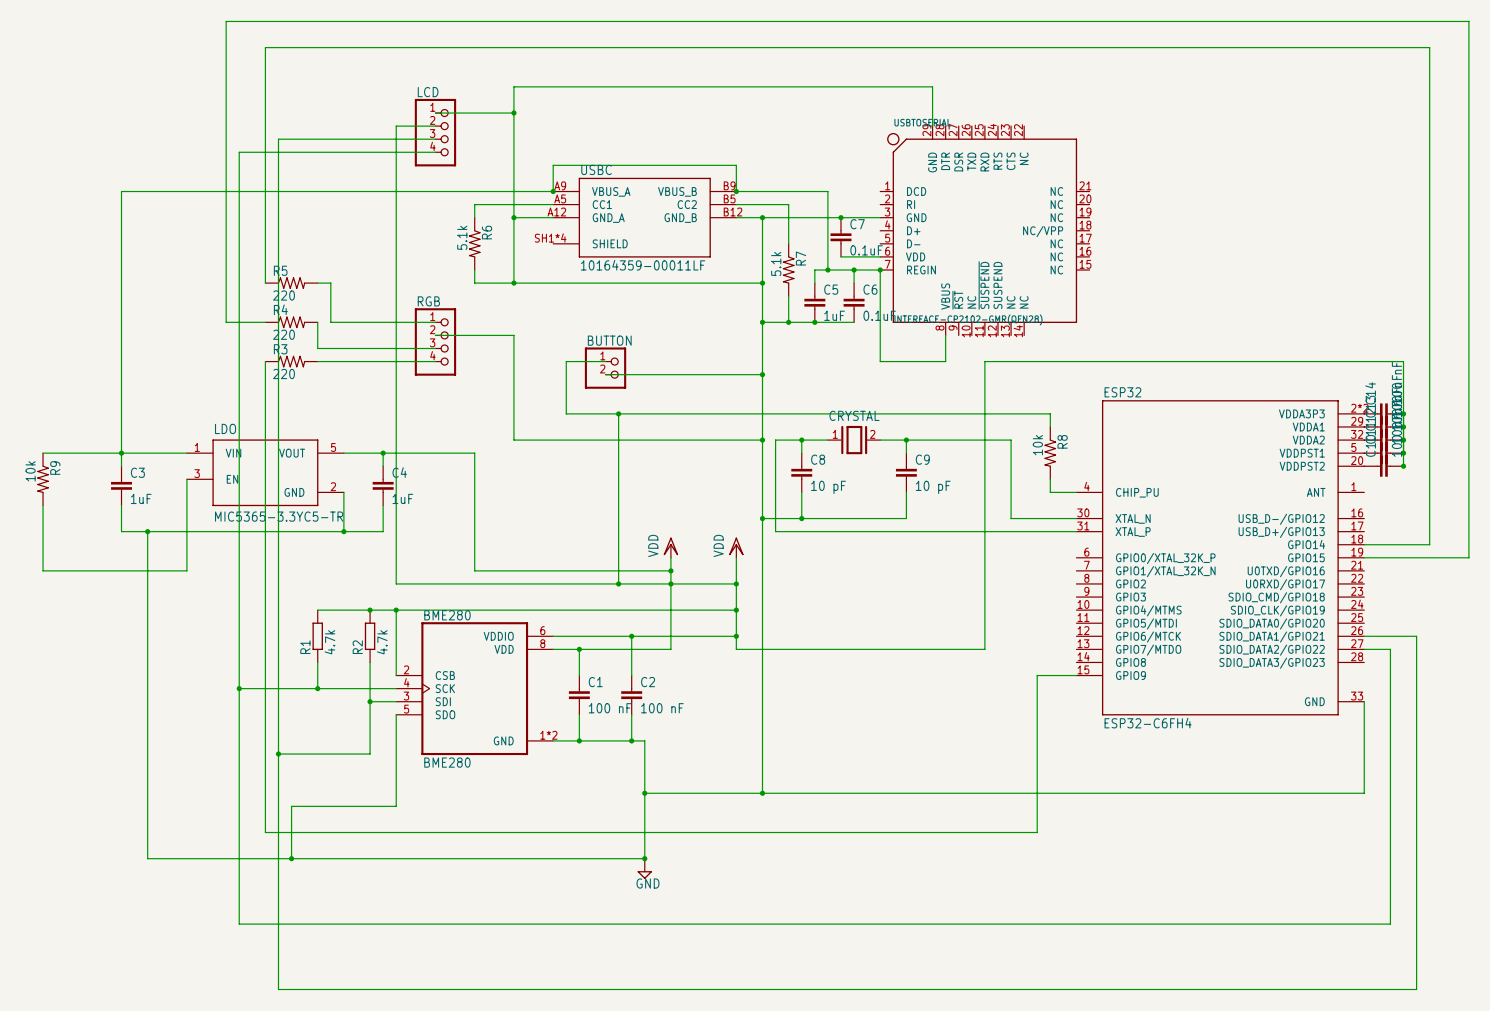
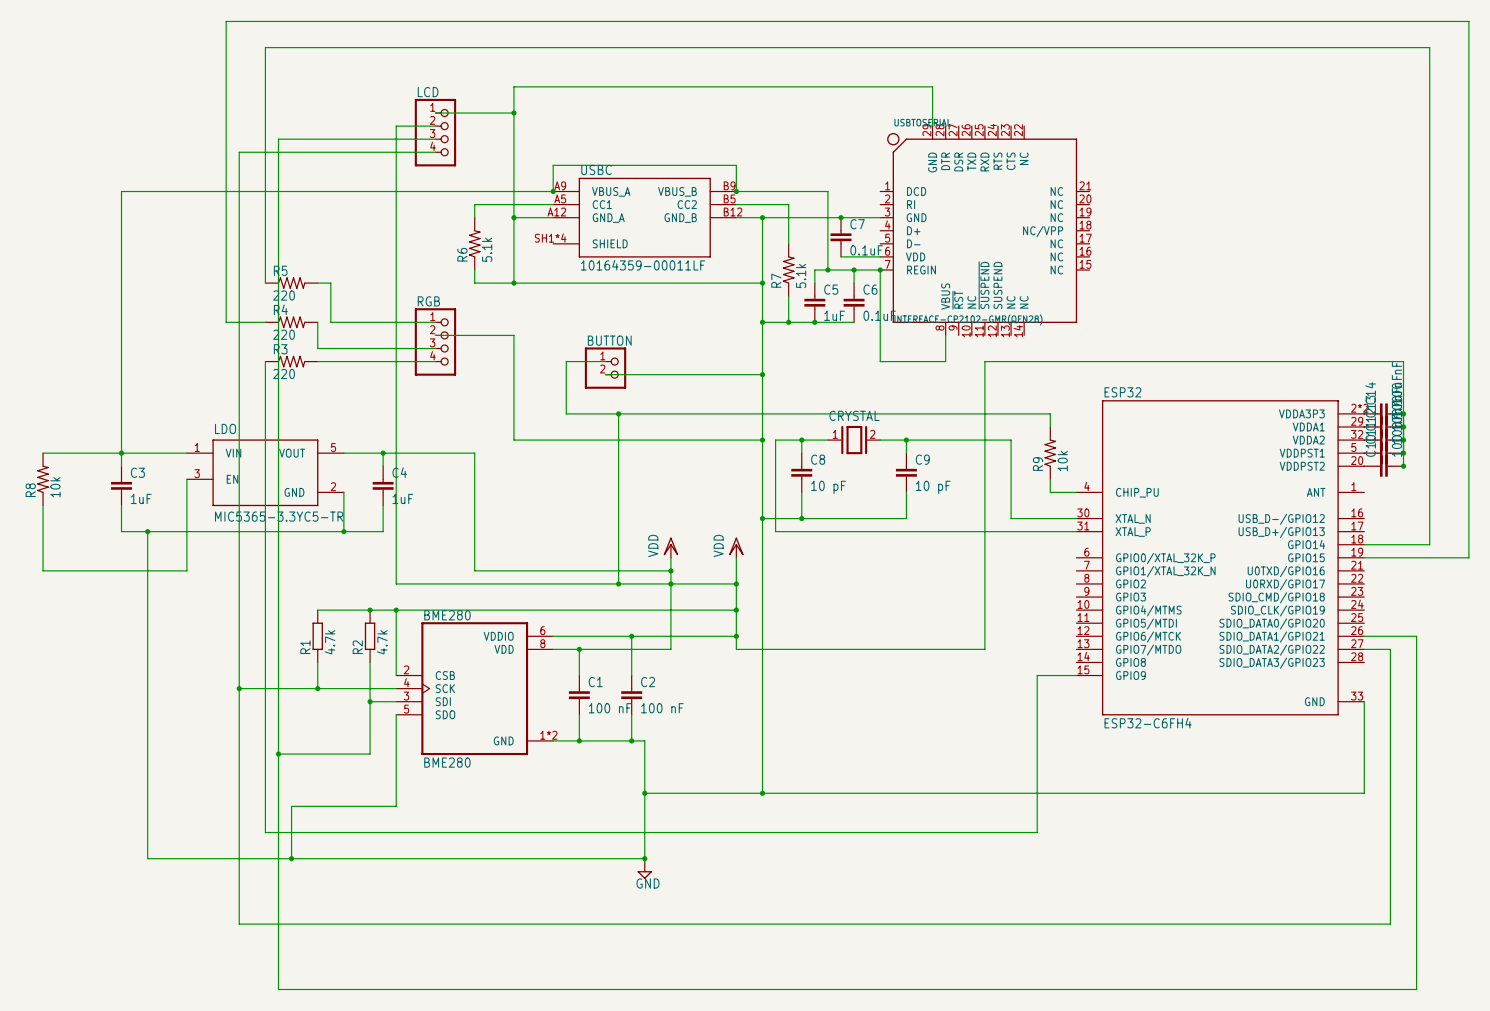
R6 rotation: 0° (474, 243) -> 180° (474, 243)
R7 rotation: 0° (788, 270) -> 180° (788, 270)
R8 rotation: 0° (1050, 453) -> 180° (43, 479)
R8 position: (1050, 453) -> (43, 479)
R9 rotation: 0° (43, 479) -> 180° (1050, 453)
R9 position: (43, 479) -> (1050, 453)

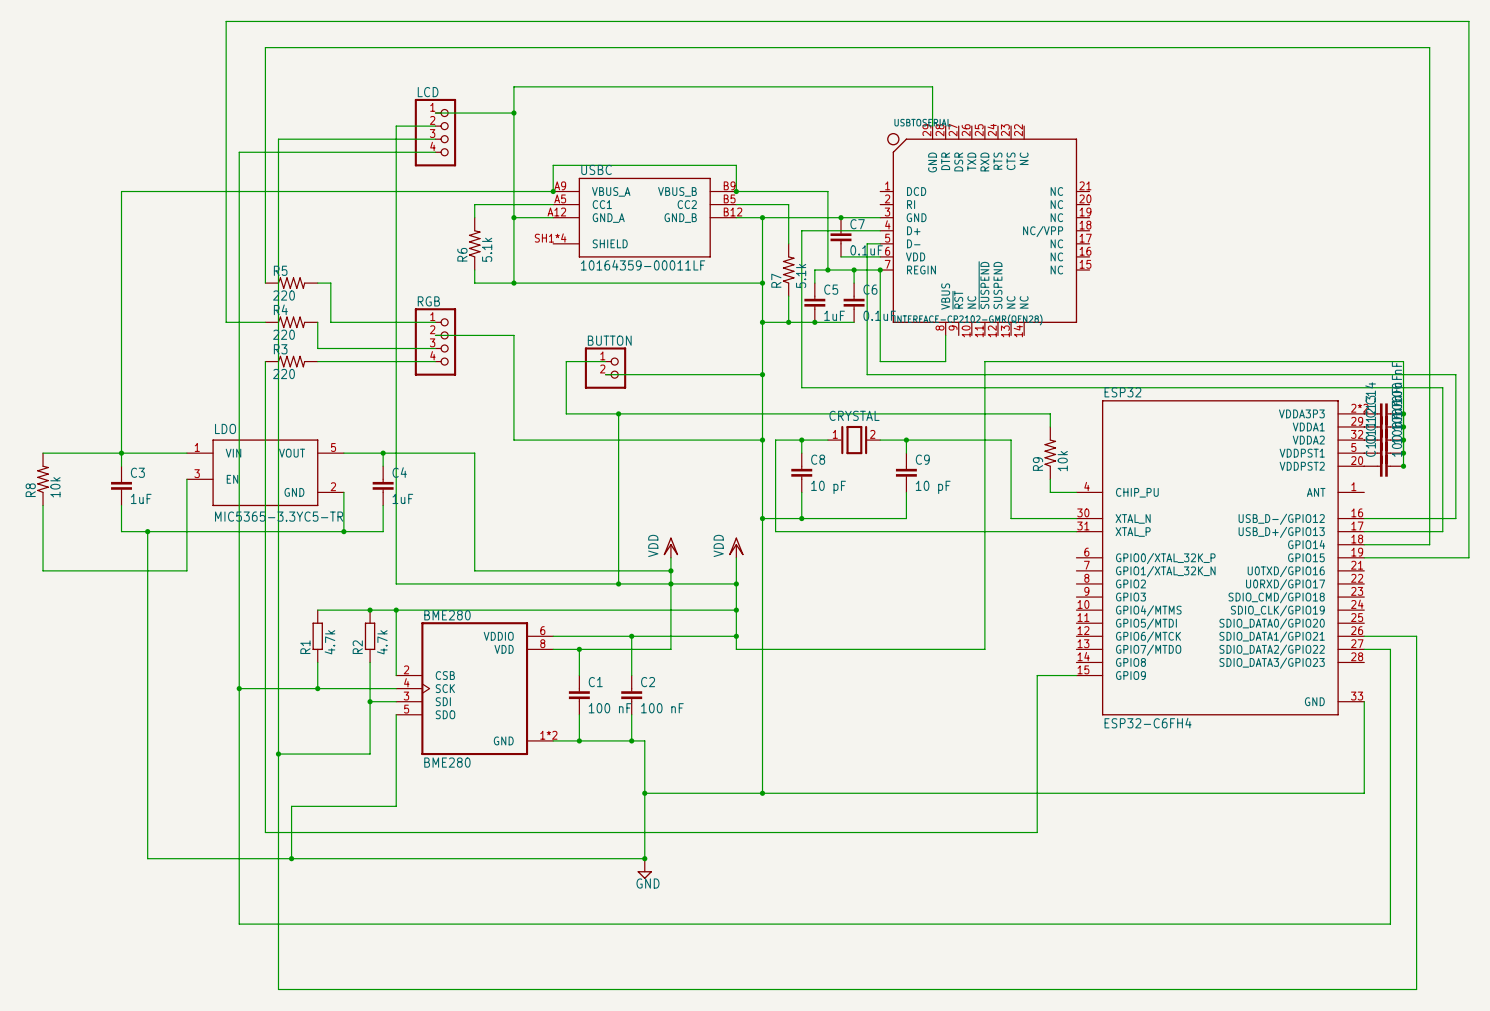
wire: none -> (880, 230) (801, 230) (801, 387) (1442, 387) (1442, 531) (1364, 531)
wire: none -> (880, 243) (867, 243) (867, 374) (1455, 374) (1455, 518) (1364, 518)

